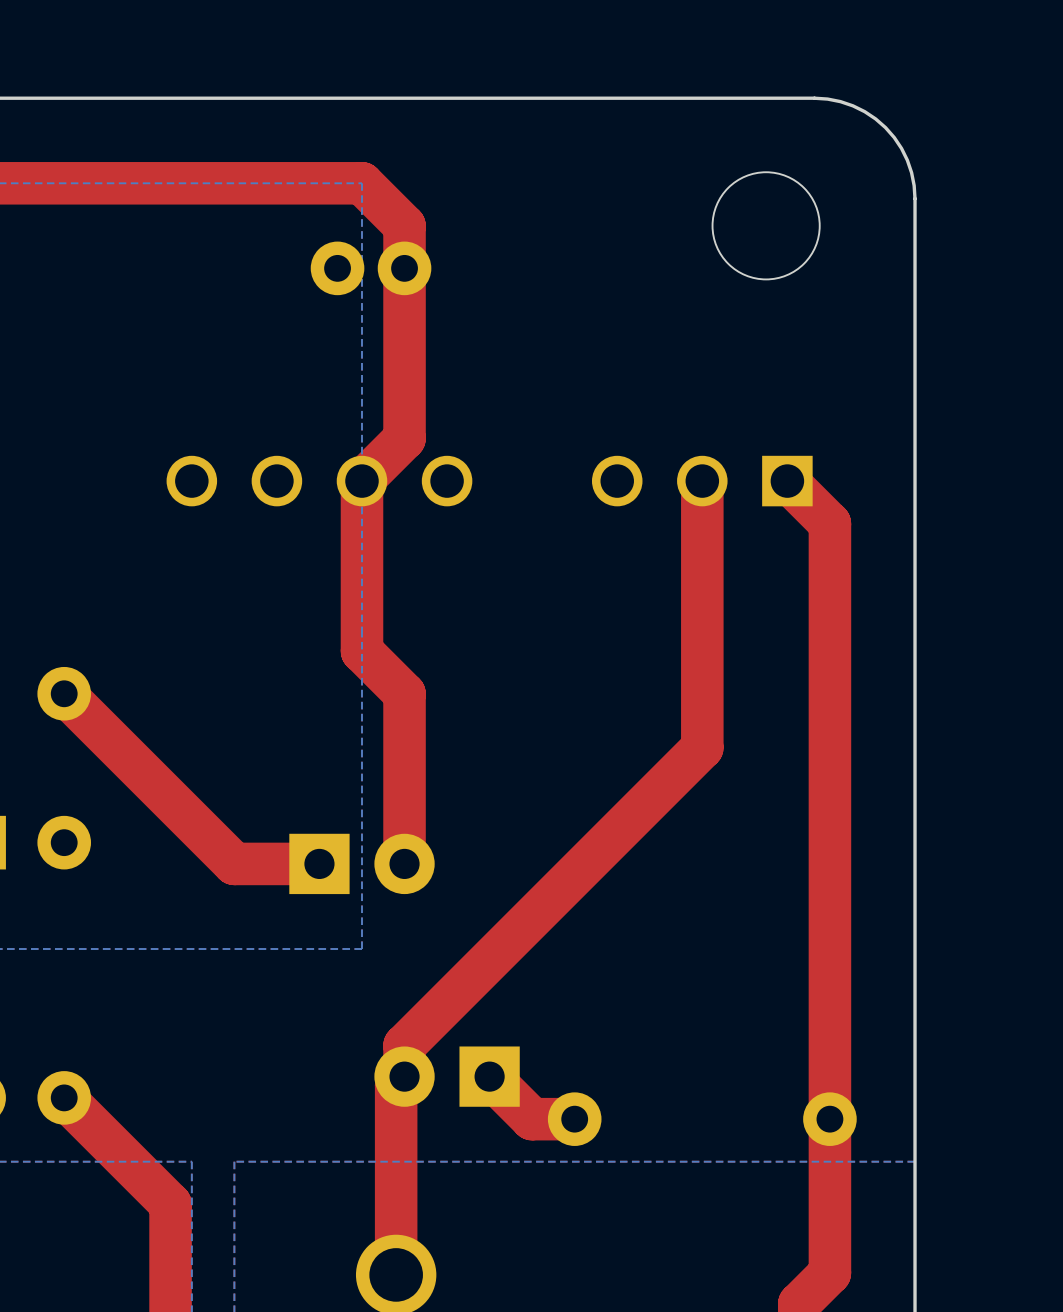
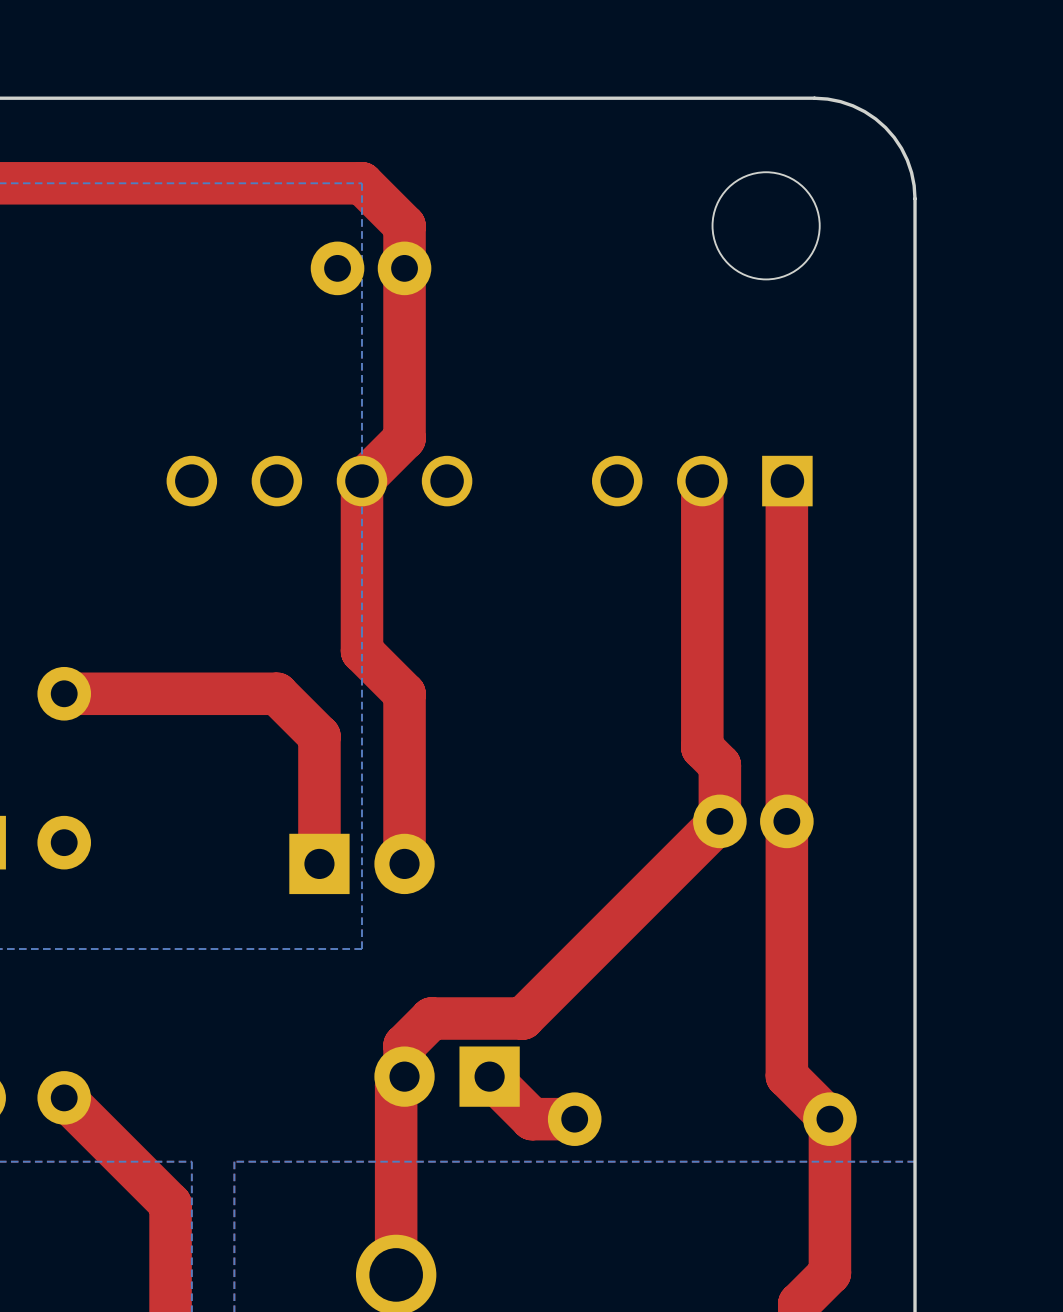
top track: (787, 481) (829, 523) (829, 1119) -> (787, 481) (786, 1076) (829, 1119)
top track: (64, 693) (234, 863) (319, 863) -> (64, 693) (276, 693) (319, 736) (319, 863)
top track: (702, 747) (431, 1018) -> (702, 747) (719, 765) (719, 821) (522, 1018) (431, 1018)
part: none -> (753, 821)

